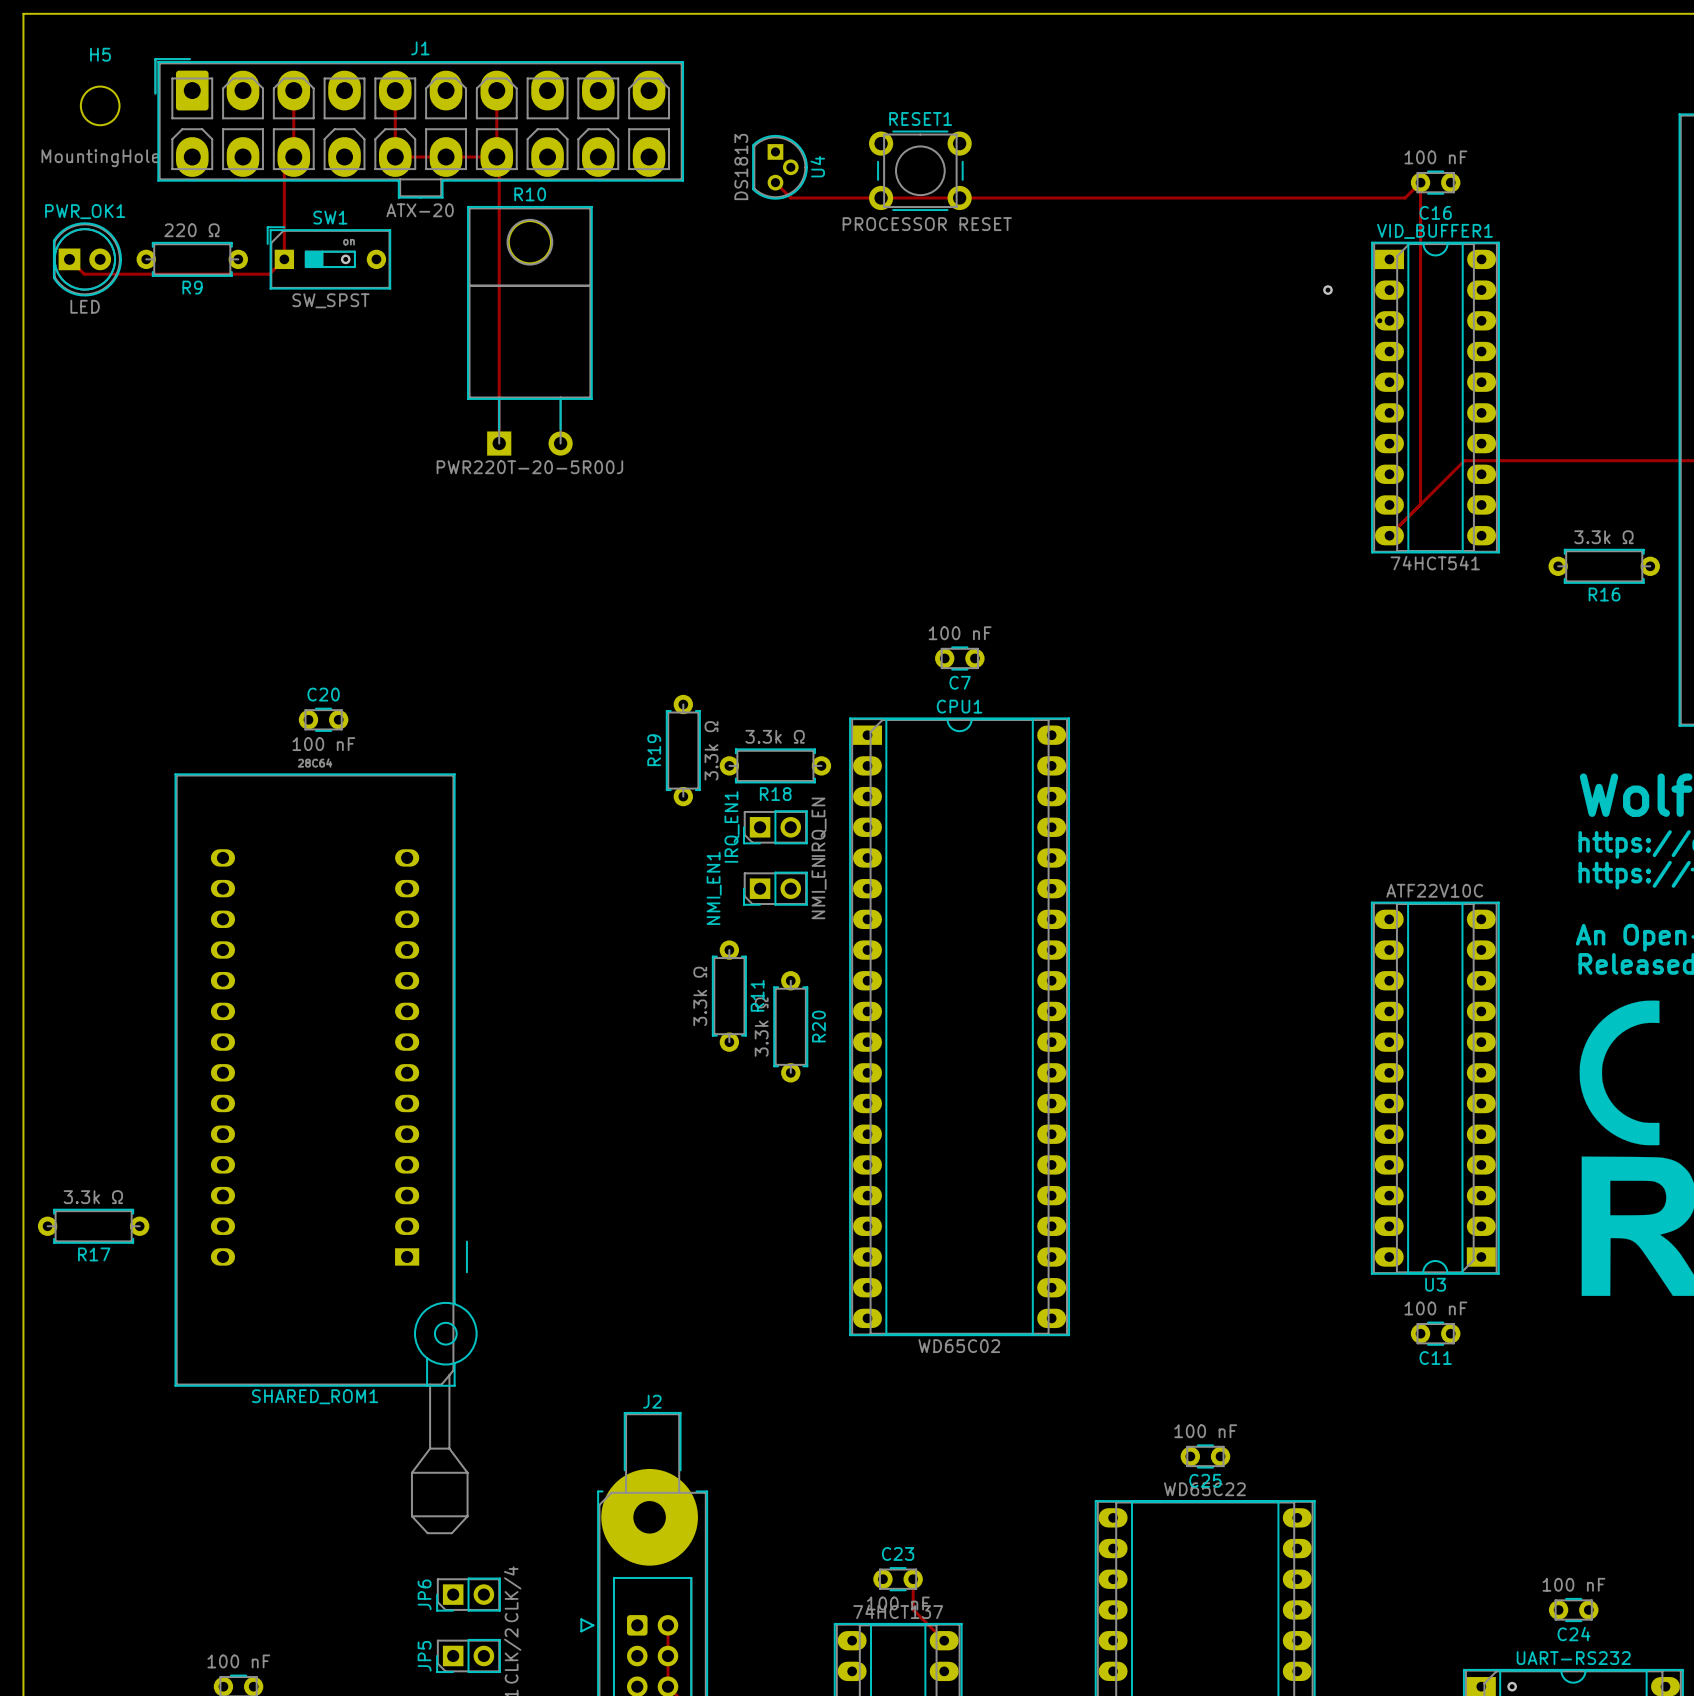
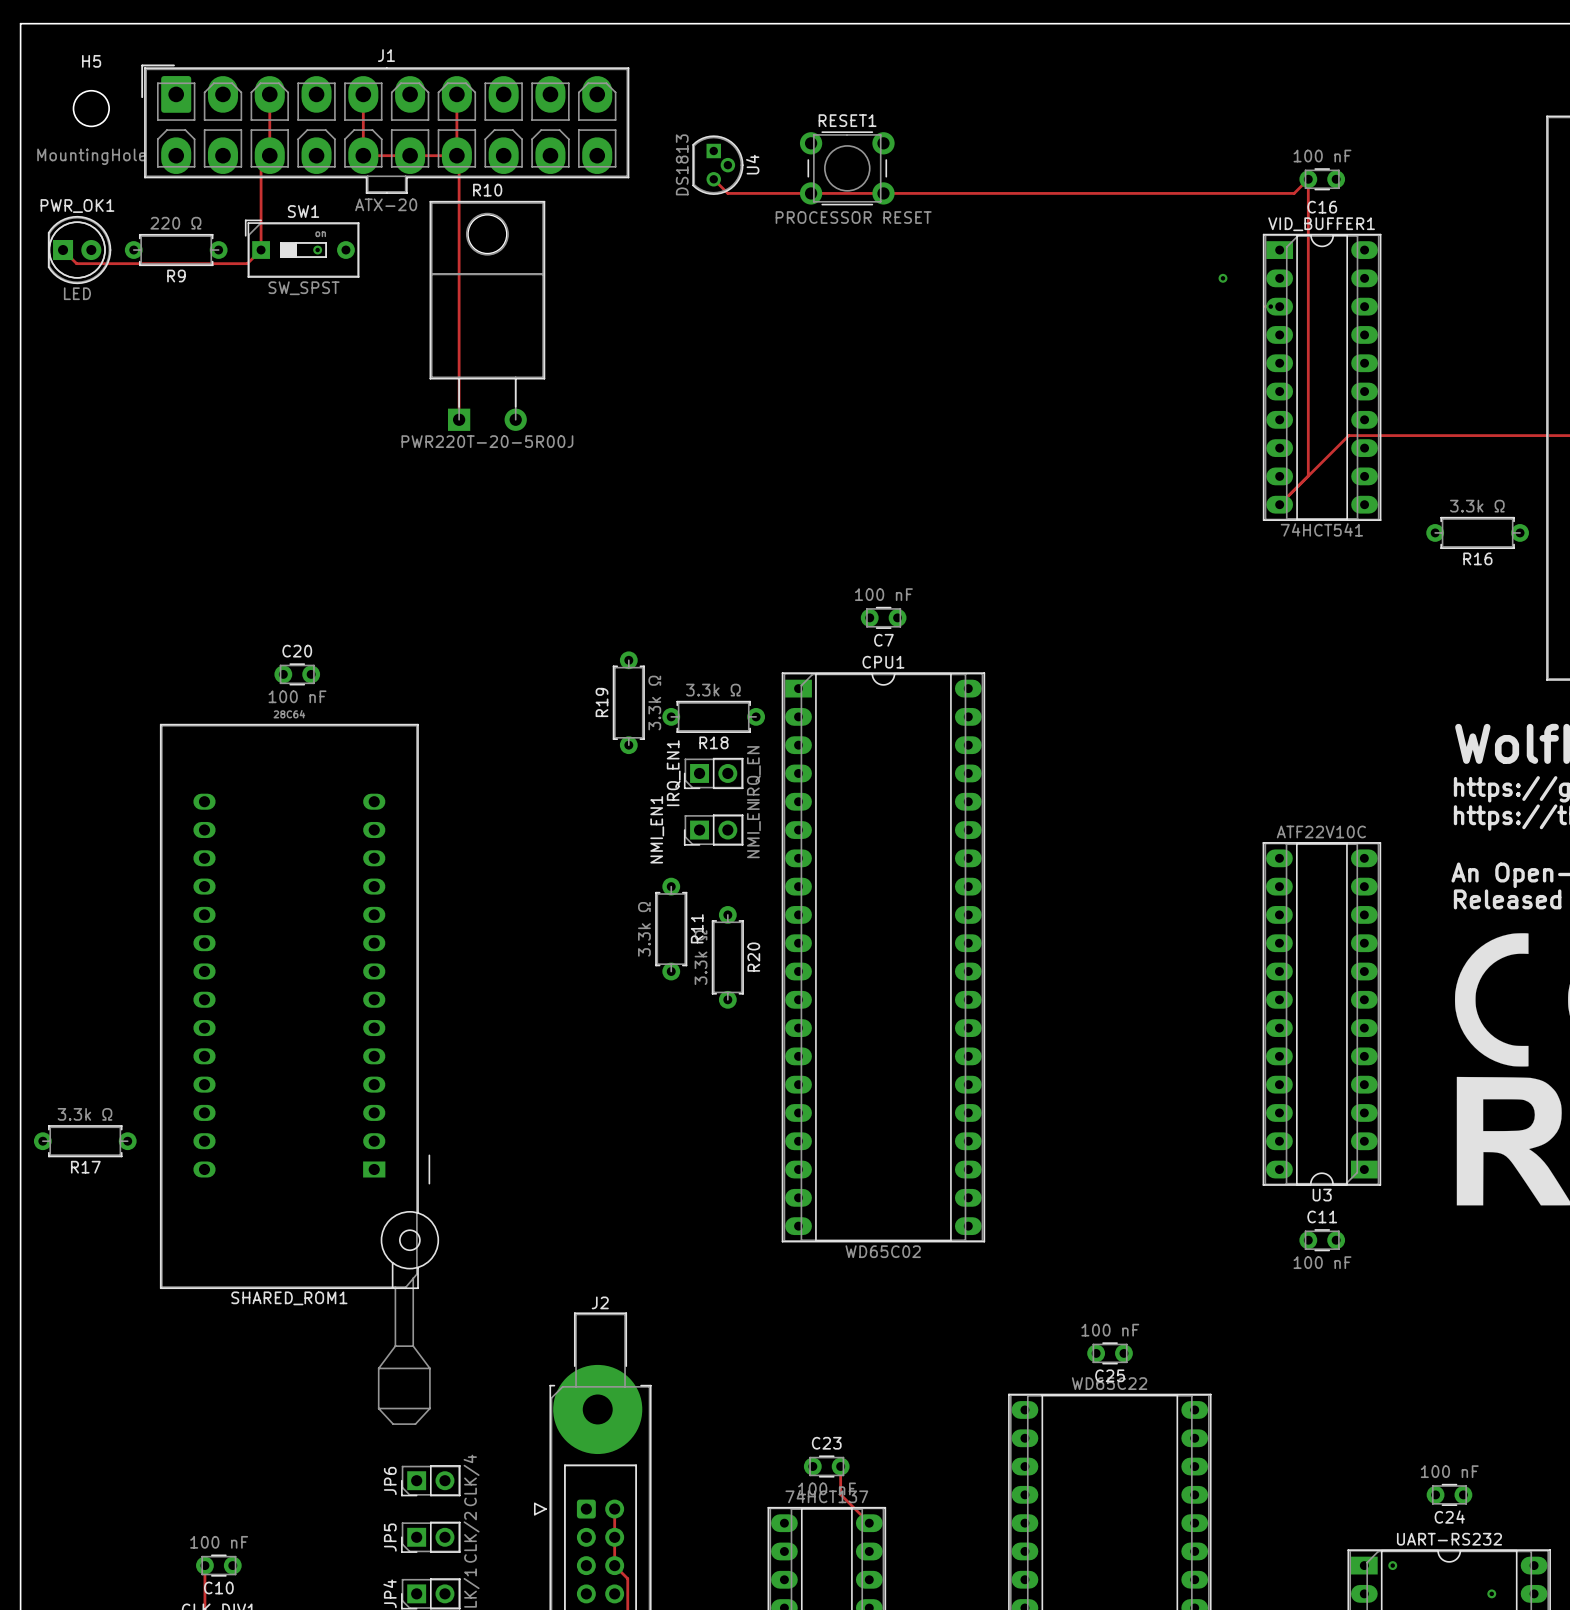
C11 value position: 100 nF (1435, 1308) -> 100 nF (1322, 1262)
C11 name position: C11 (1435, 1358) -> C11 (1322, 1216)

